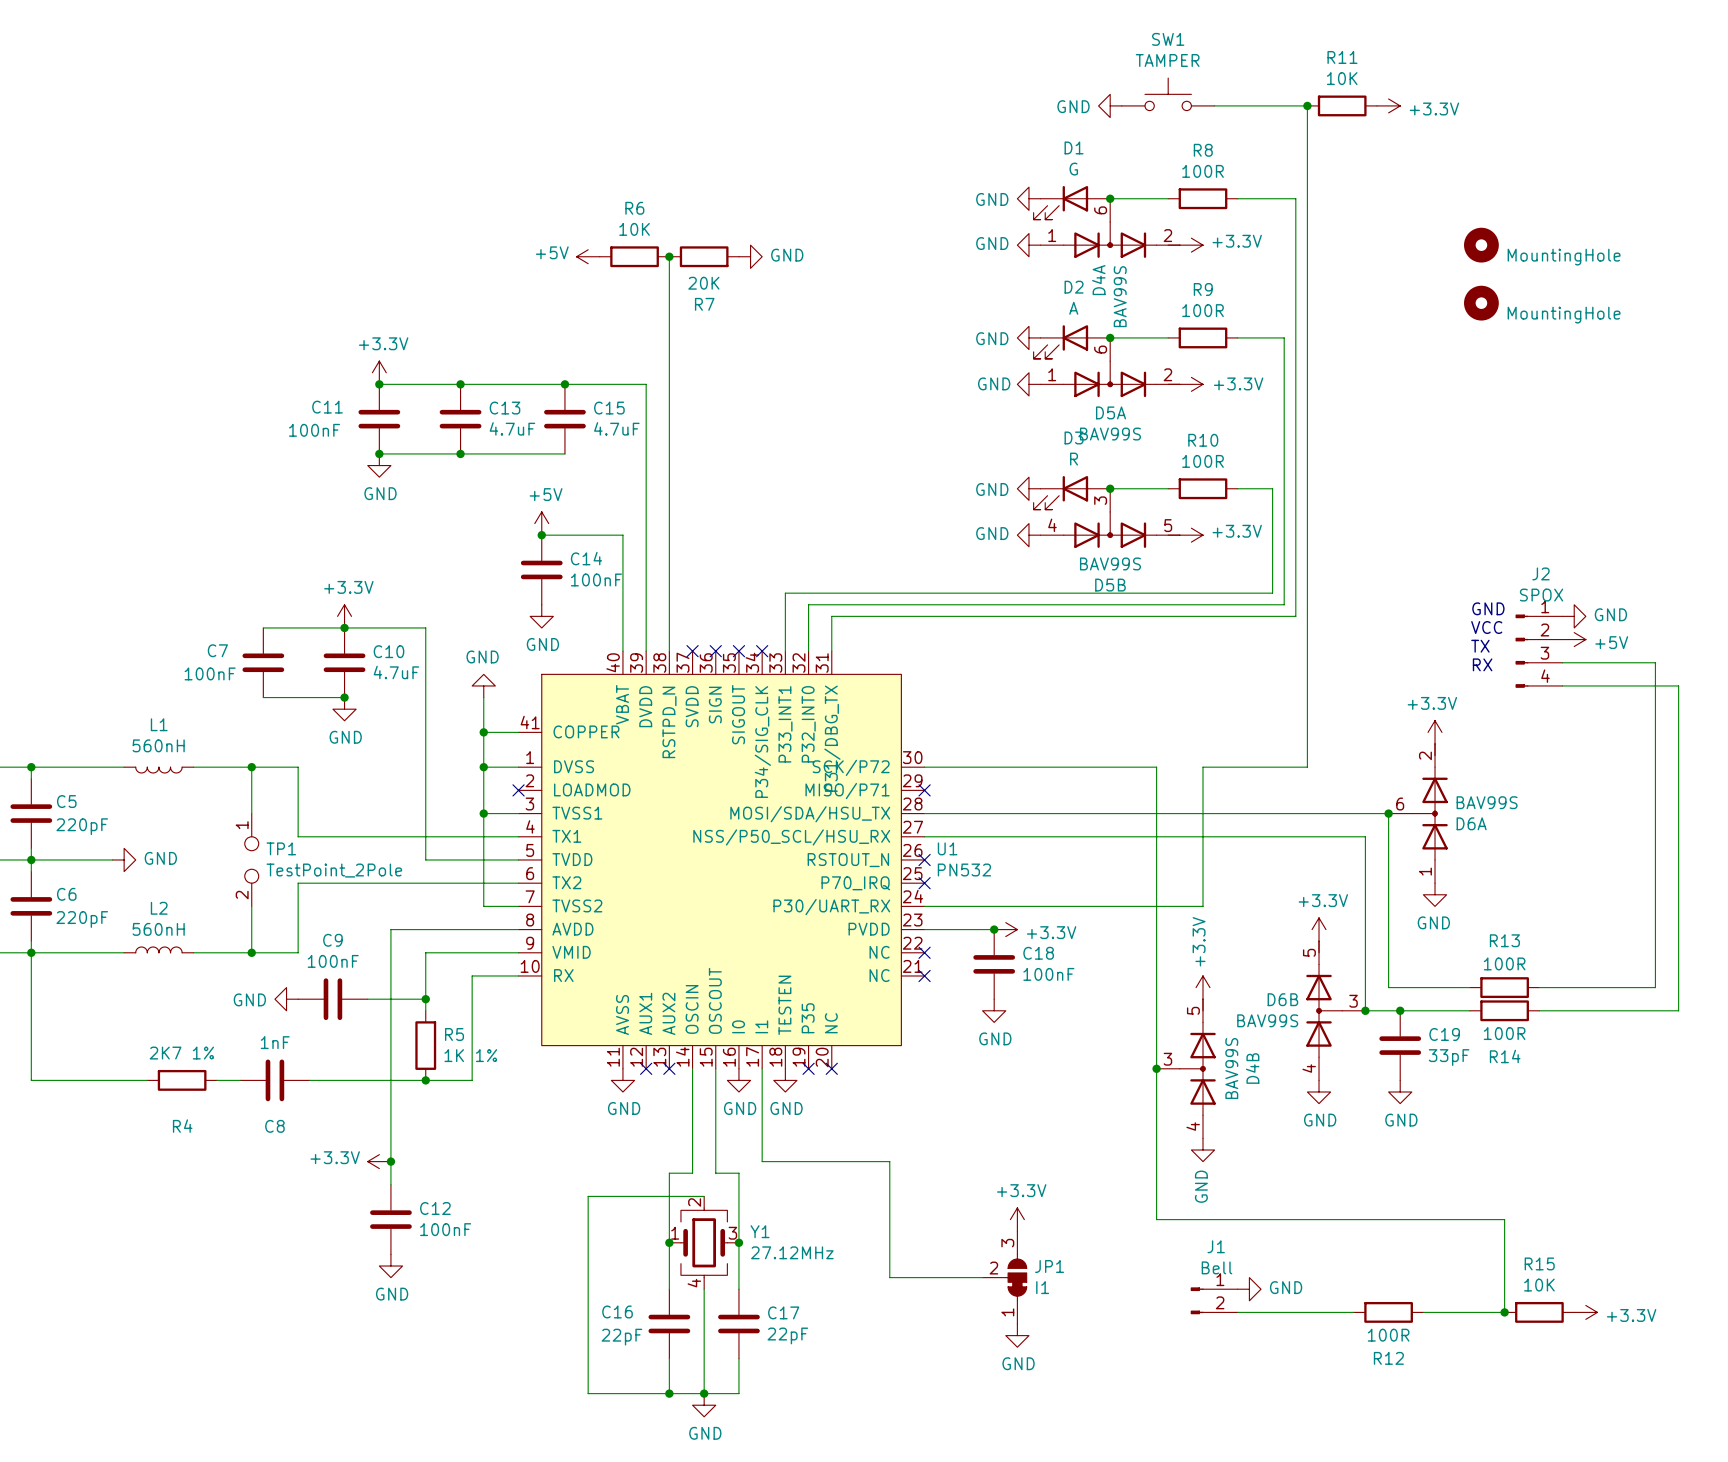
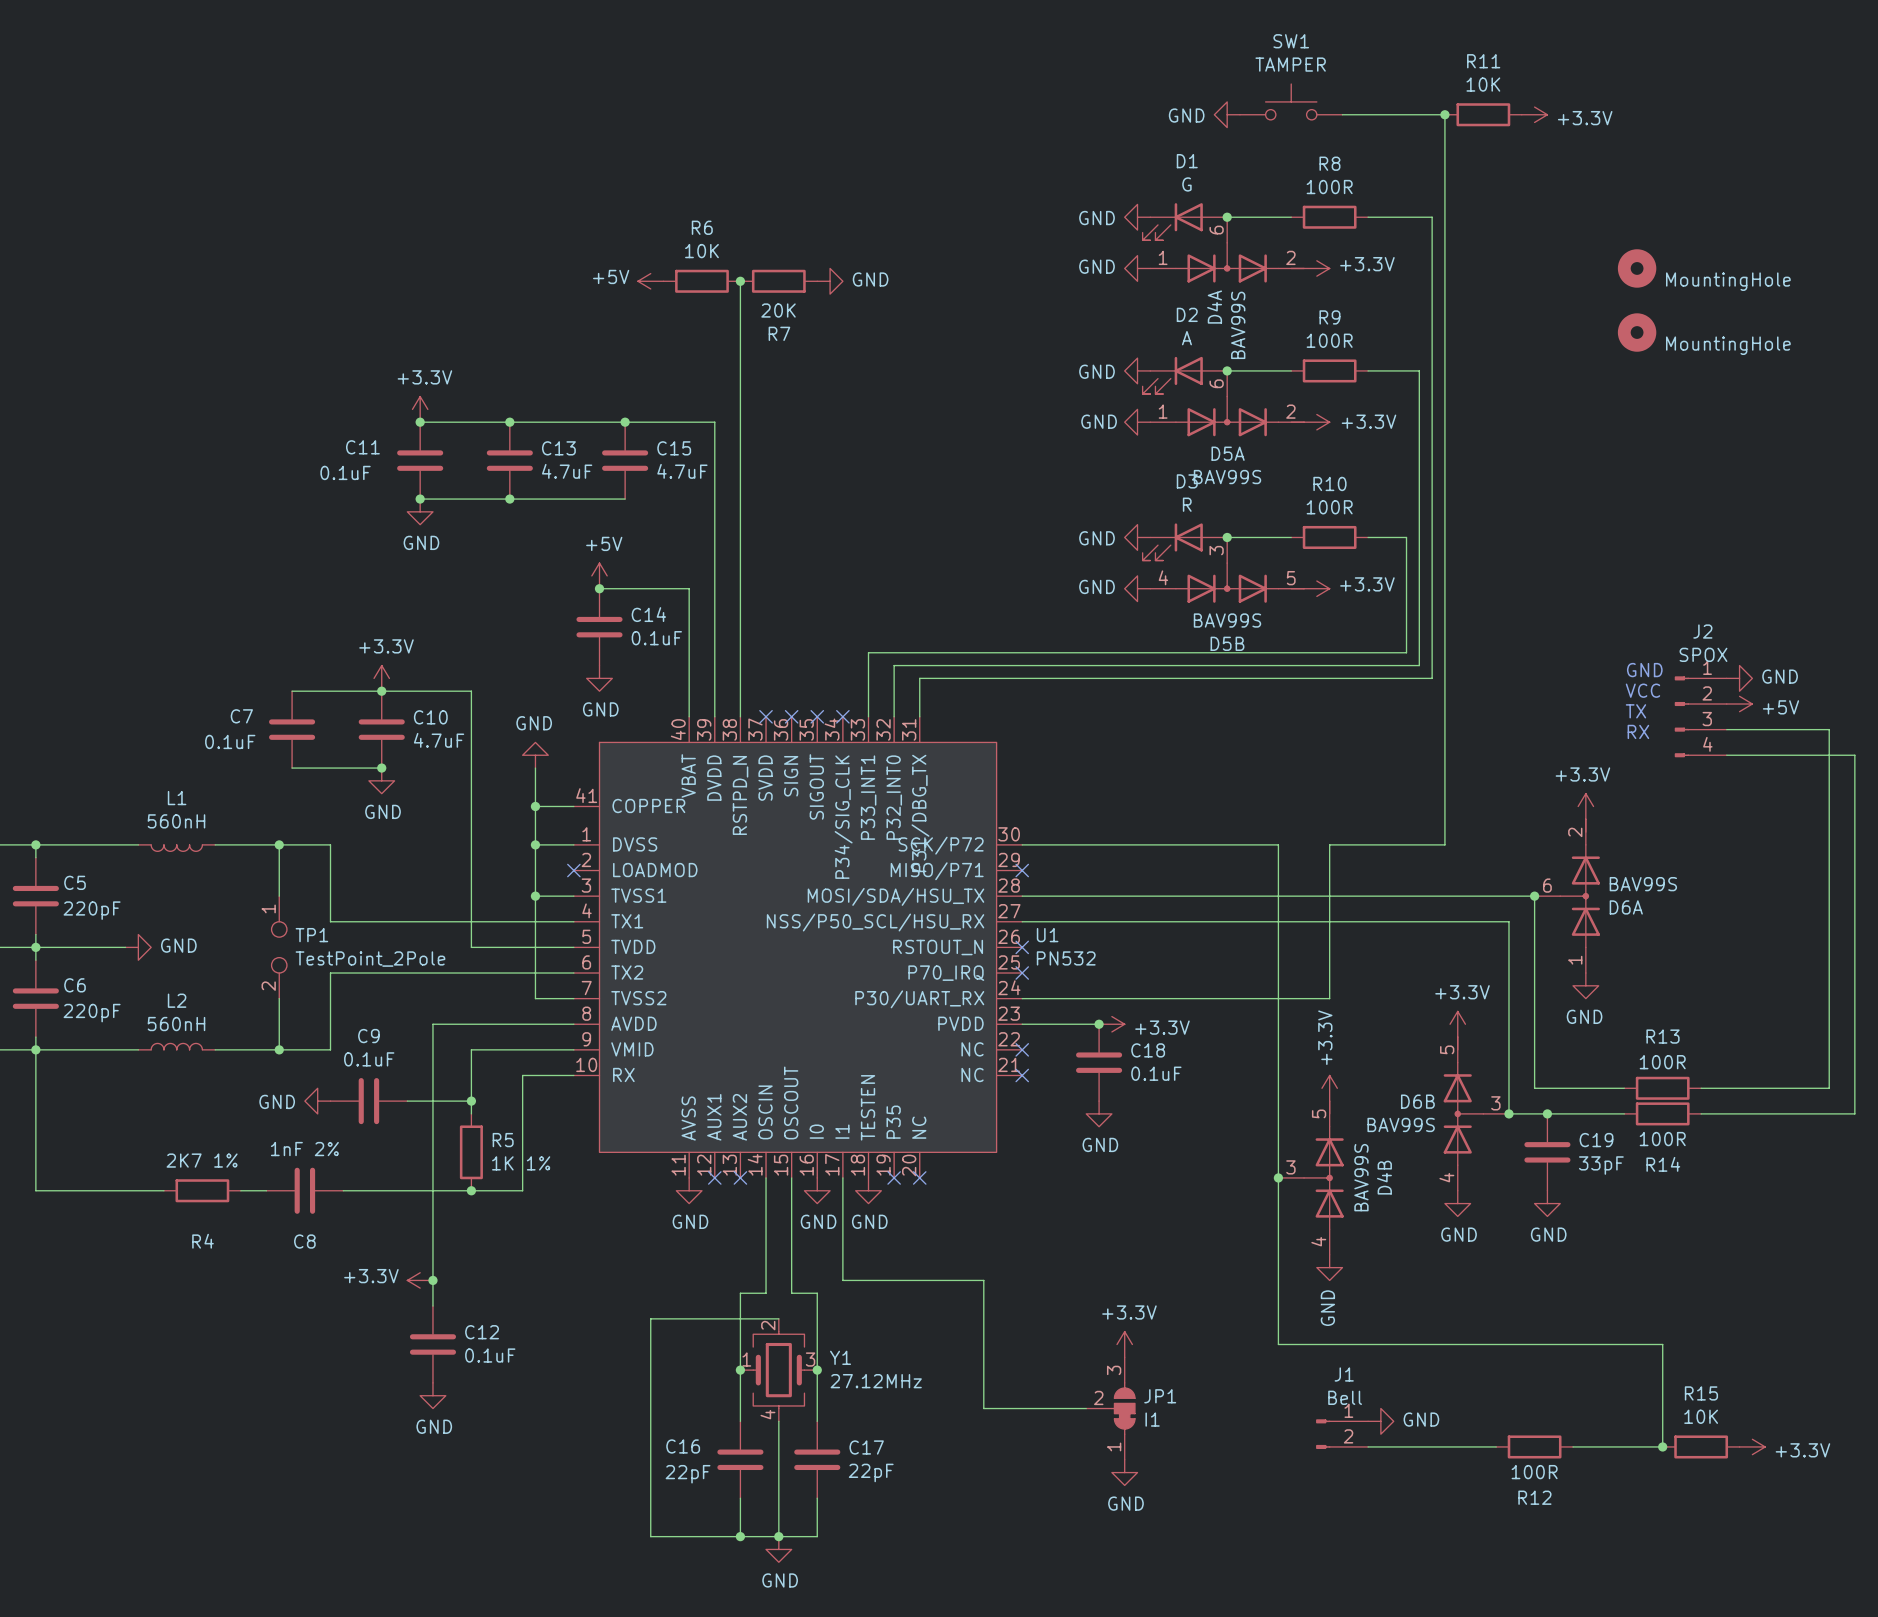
C11 value: 100nF (314, 430) -> 0.1uF (345, 472)
C14 value: 100nF (596, 579) -> 0.1uF (656, 638)
C7 value: 100nF (210, 673) -> 0.1uF (230, 741)
C9 value: 100nF (333, 961) -> 0.1uF (369, 1059)
C18 value: 100nF (1048, 974) -> 0.1uF (1156, 1073)
C8 value: 1nF (275, 1042) -> 1nF 2% (304, 1149)
C12 value: 100nF (445, 1229) -> 0.1uF (490, 1355)

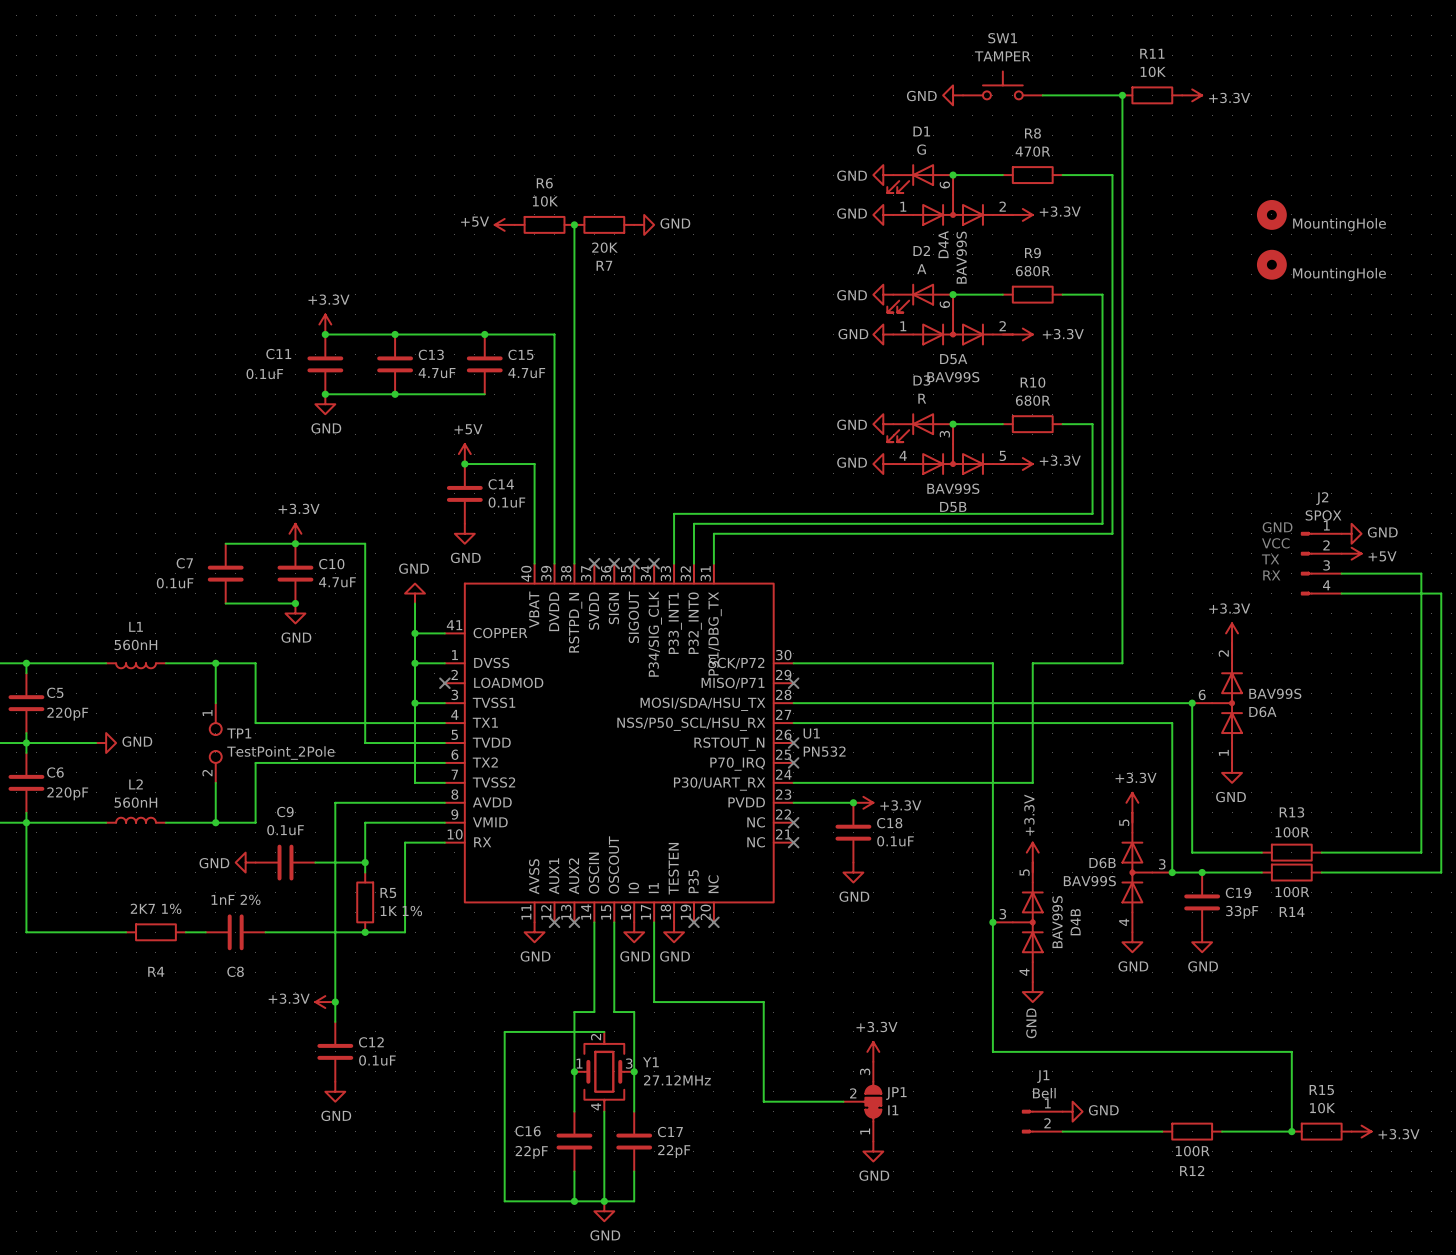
R8 value: 100R (1329, 187) -> 470R (1032, 151)
R9 value: 100R (1329, 340) -> 680R (1033, 271)
R10 value: 100R (1329, 507) -> 680R (1033, 400)

